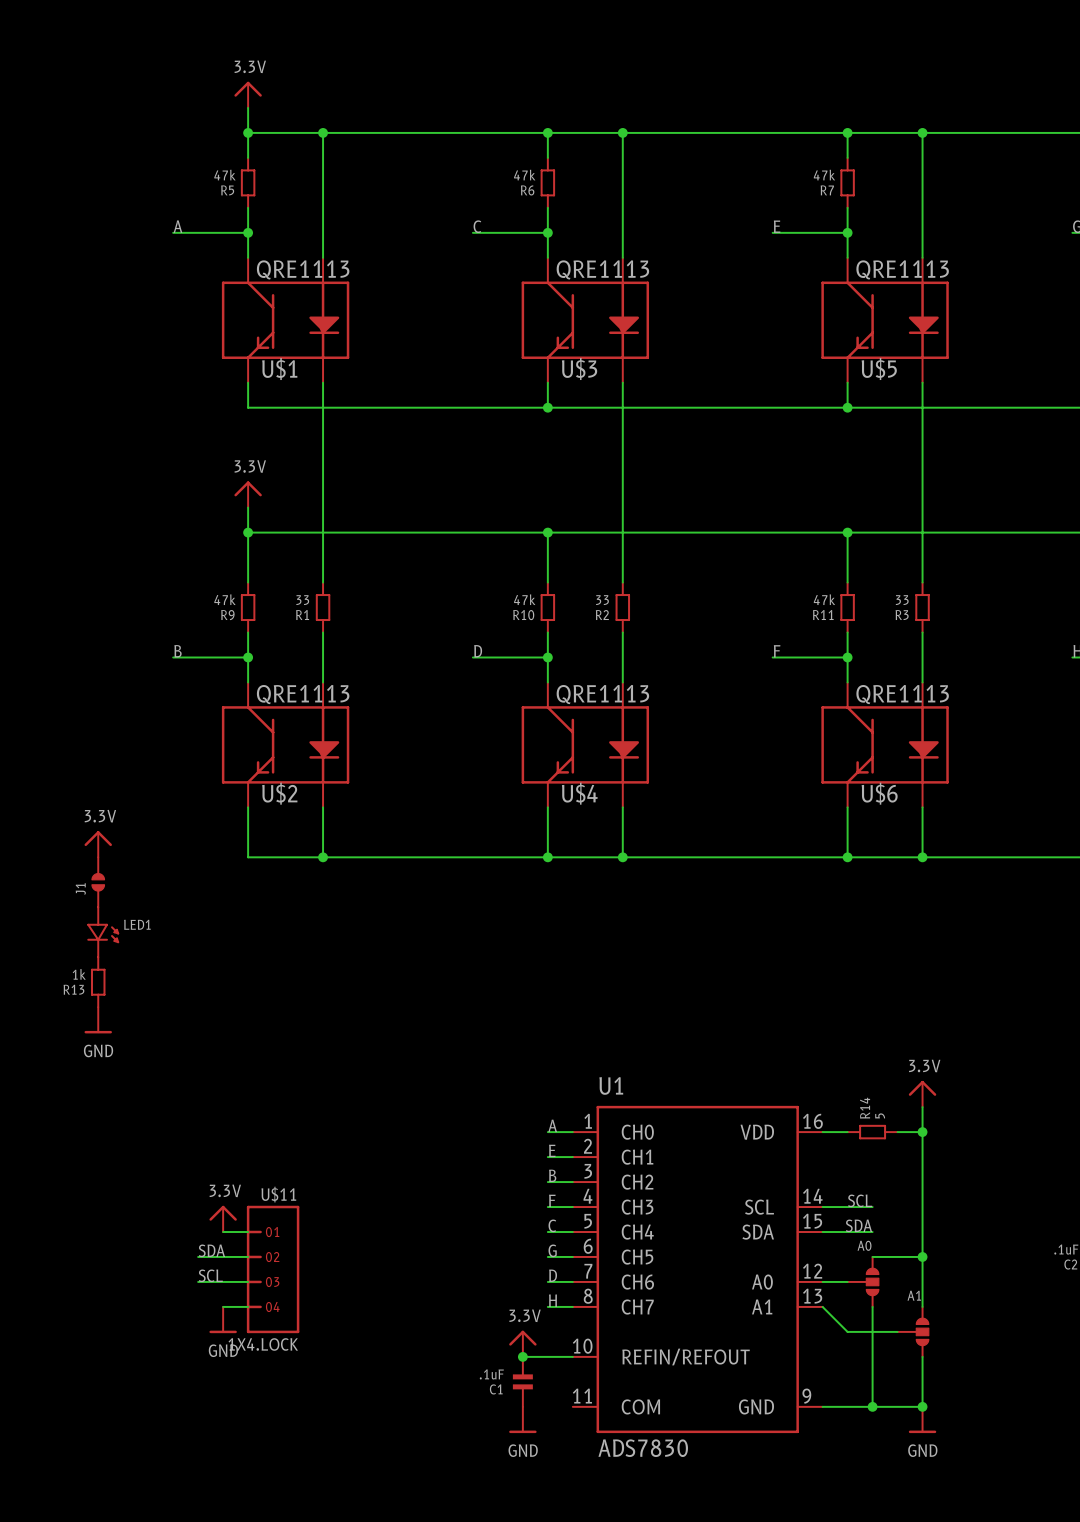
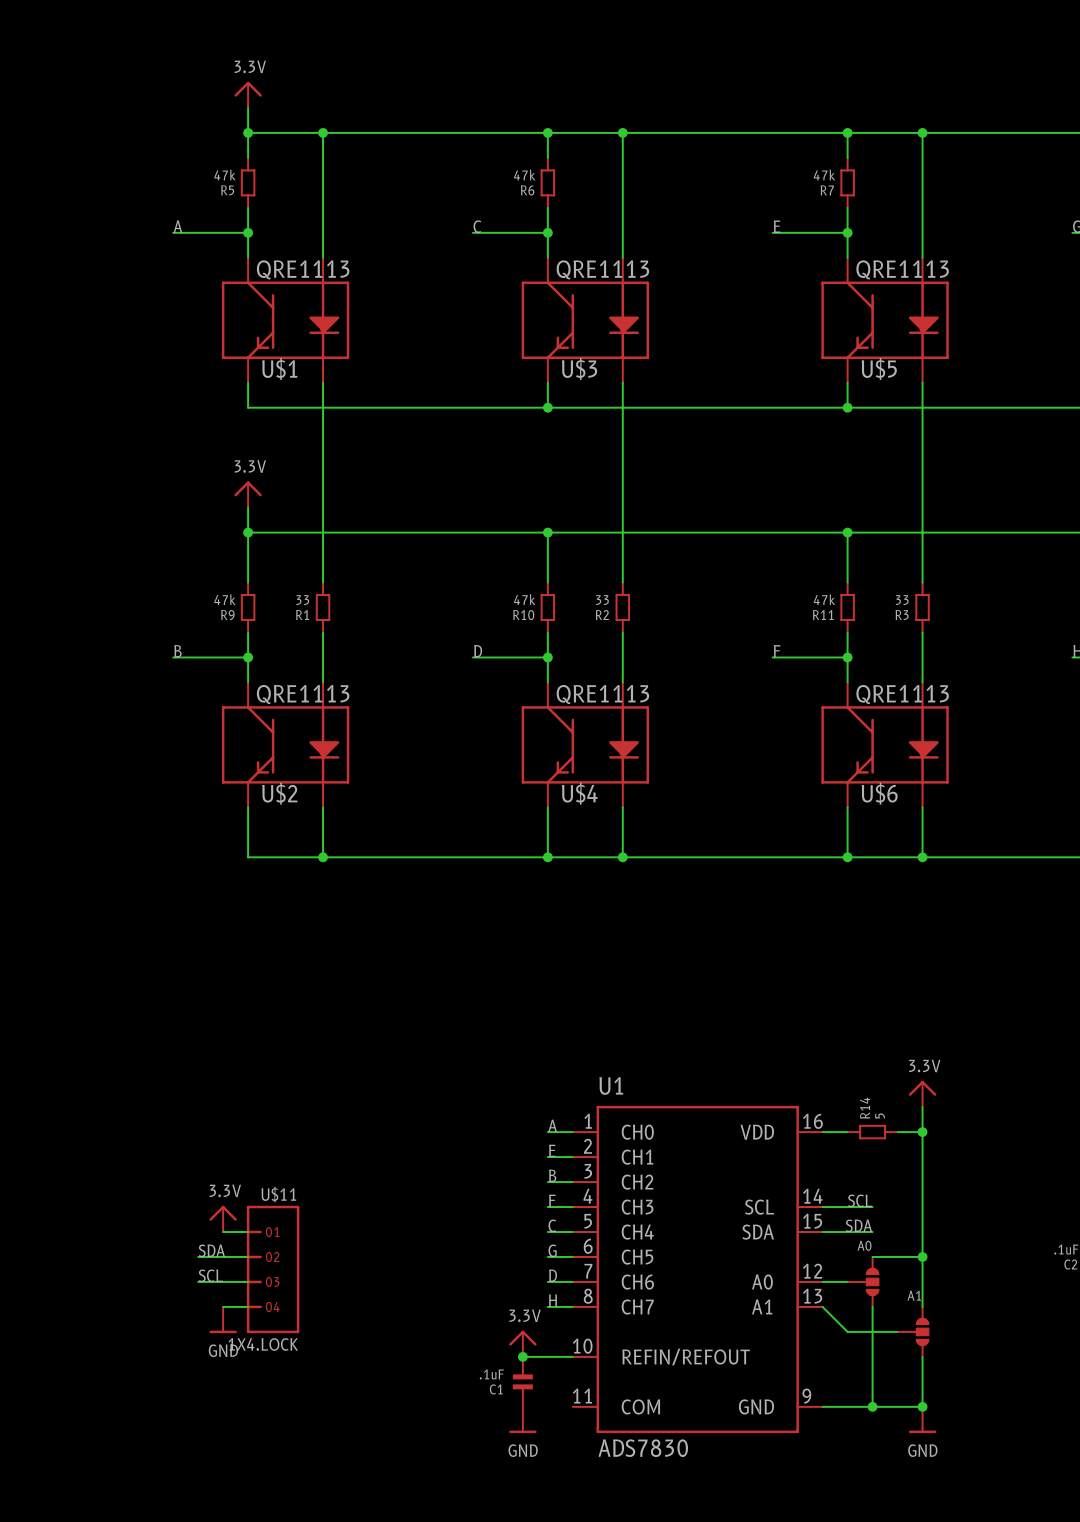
power symbol: 3.3V (98, 844) -> none
J1: (98, 882) -> none
LED1: (103, 932) -> none
R13: 1k (98, 982) -> none
power symbol: GND (98, 1020) -> none

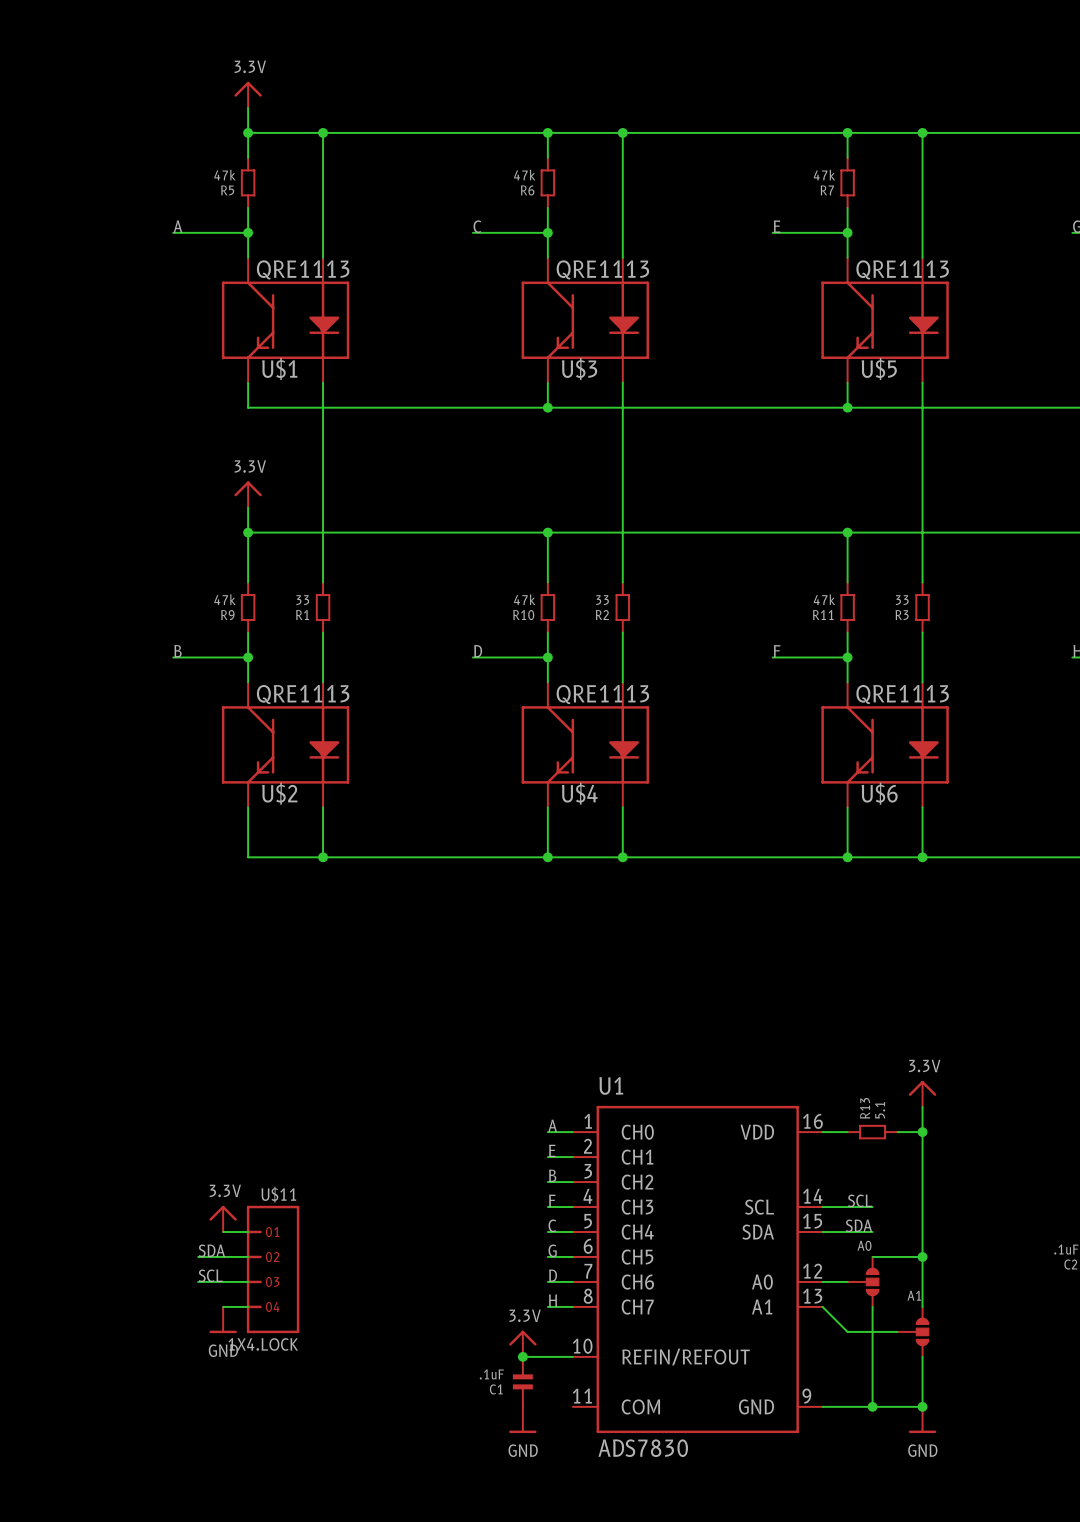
R14 name: R14 (865, 1108) -> R13 (865, 1108)
R14 value: 5 (880, 1115) -> 5.1 (880, 1110)

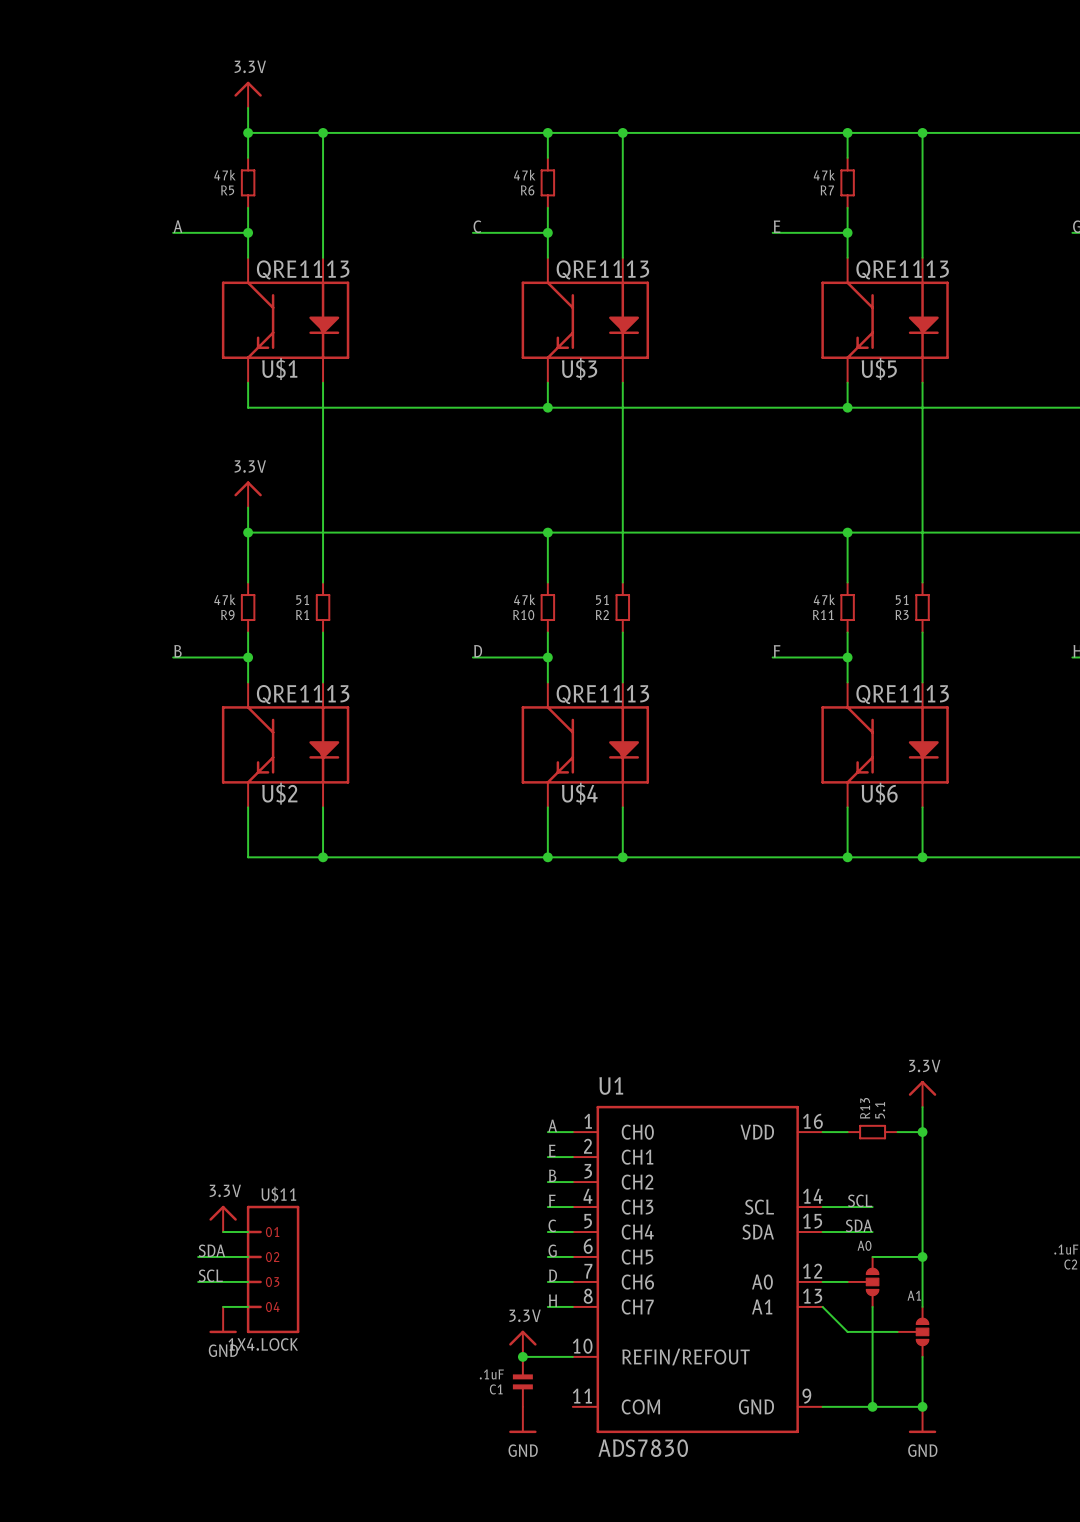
R1 value: 33 (302, 600) -> 51 (302, 600)
R2 value: 33 (602, 600) -> 51 (602, 600)
R3 value: 33 (902, 600) -> 51 (902, 600)

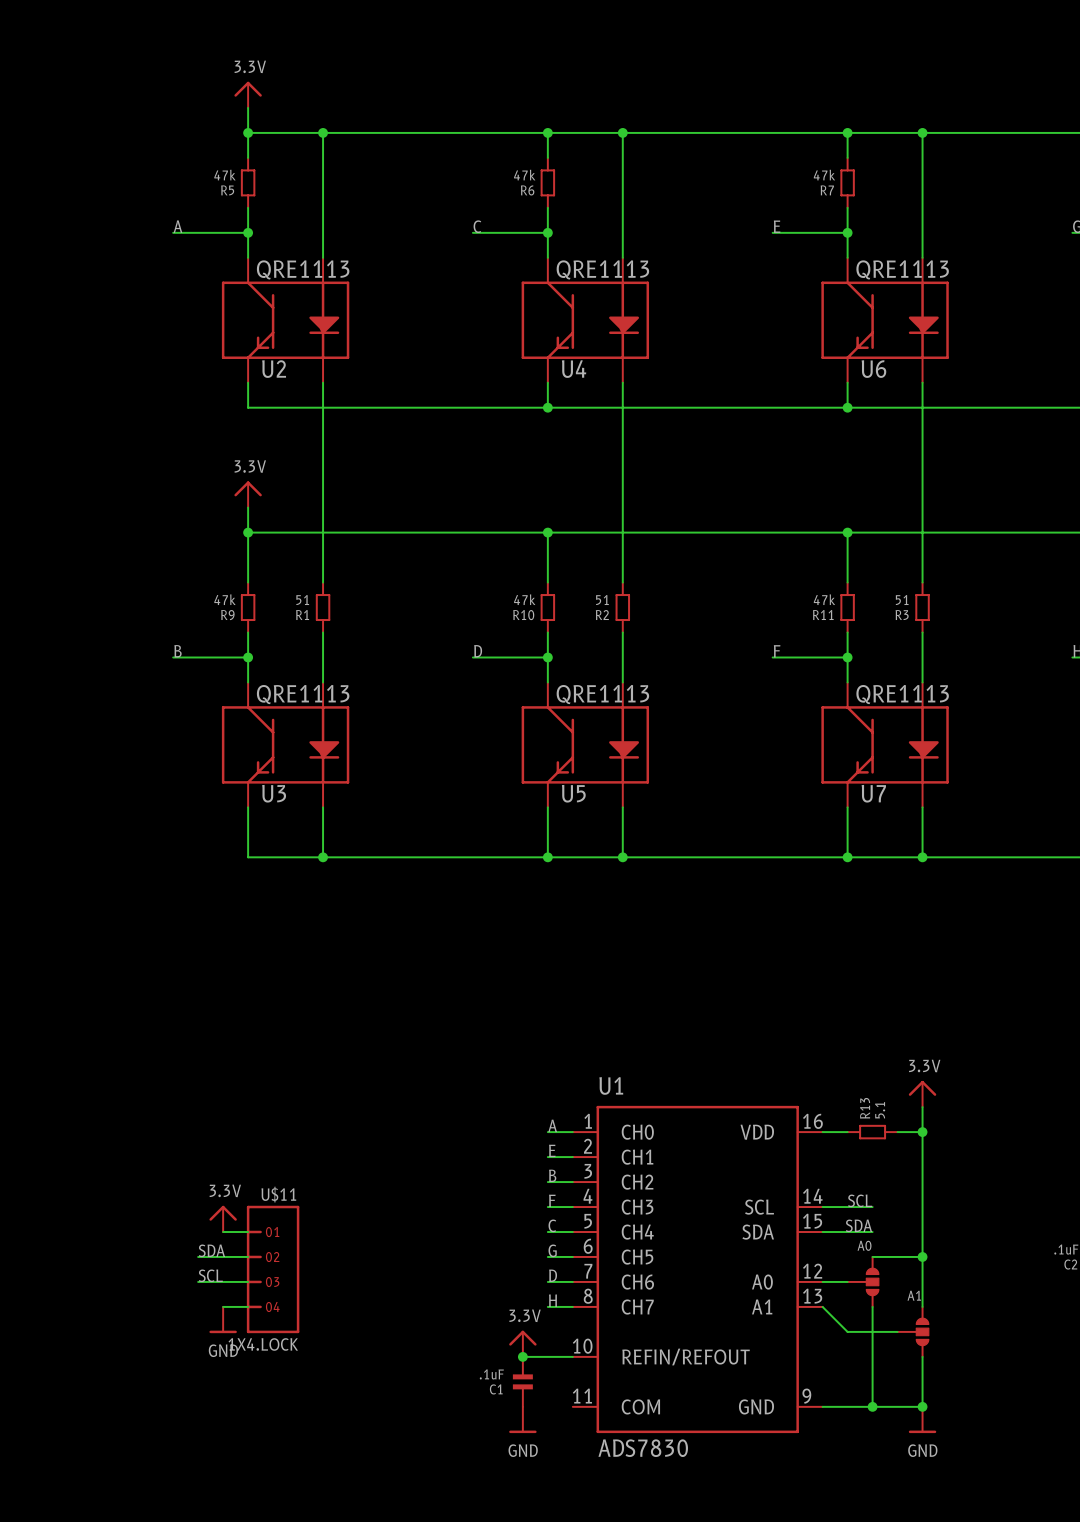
U$1 name: U$1 (279, 368) -> U2 (274, 369)
U$3 name: U$3 (579, 368) -> U4 (574, 369)
U$5 name: U$5 (879, 368) -> U6 (873, 369)
U$2 name: U$2 (279, 793) -> U3 (274, 793)
U$4 name: U$4 (579, 793) -> U5 (573, 793)
U$6 name: U$6 (879, 793) -> U7 (873, 793)

